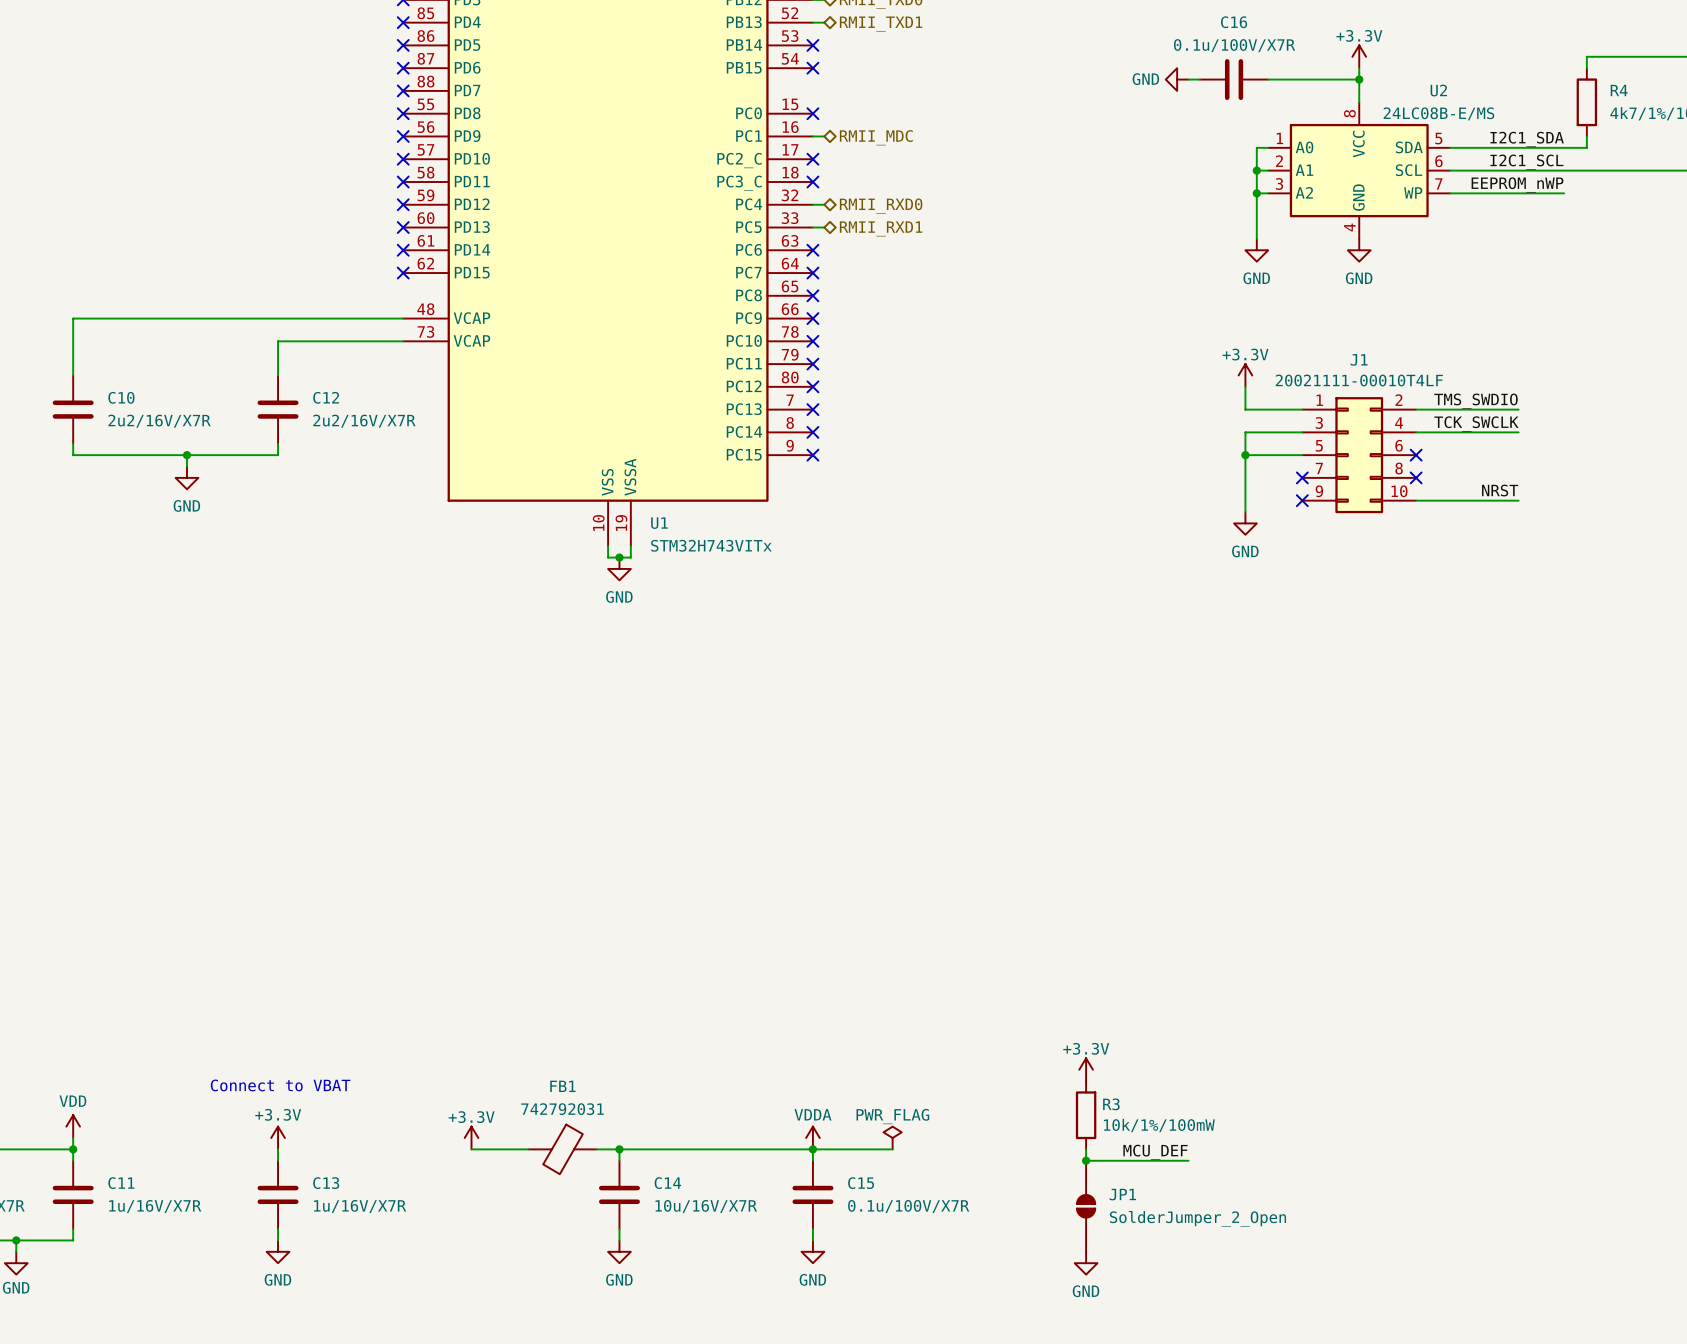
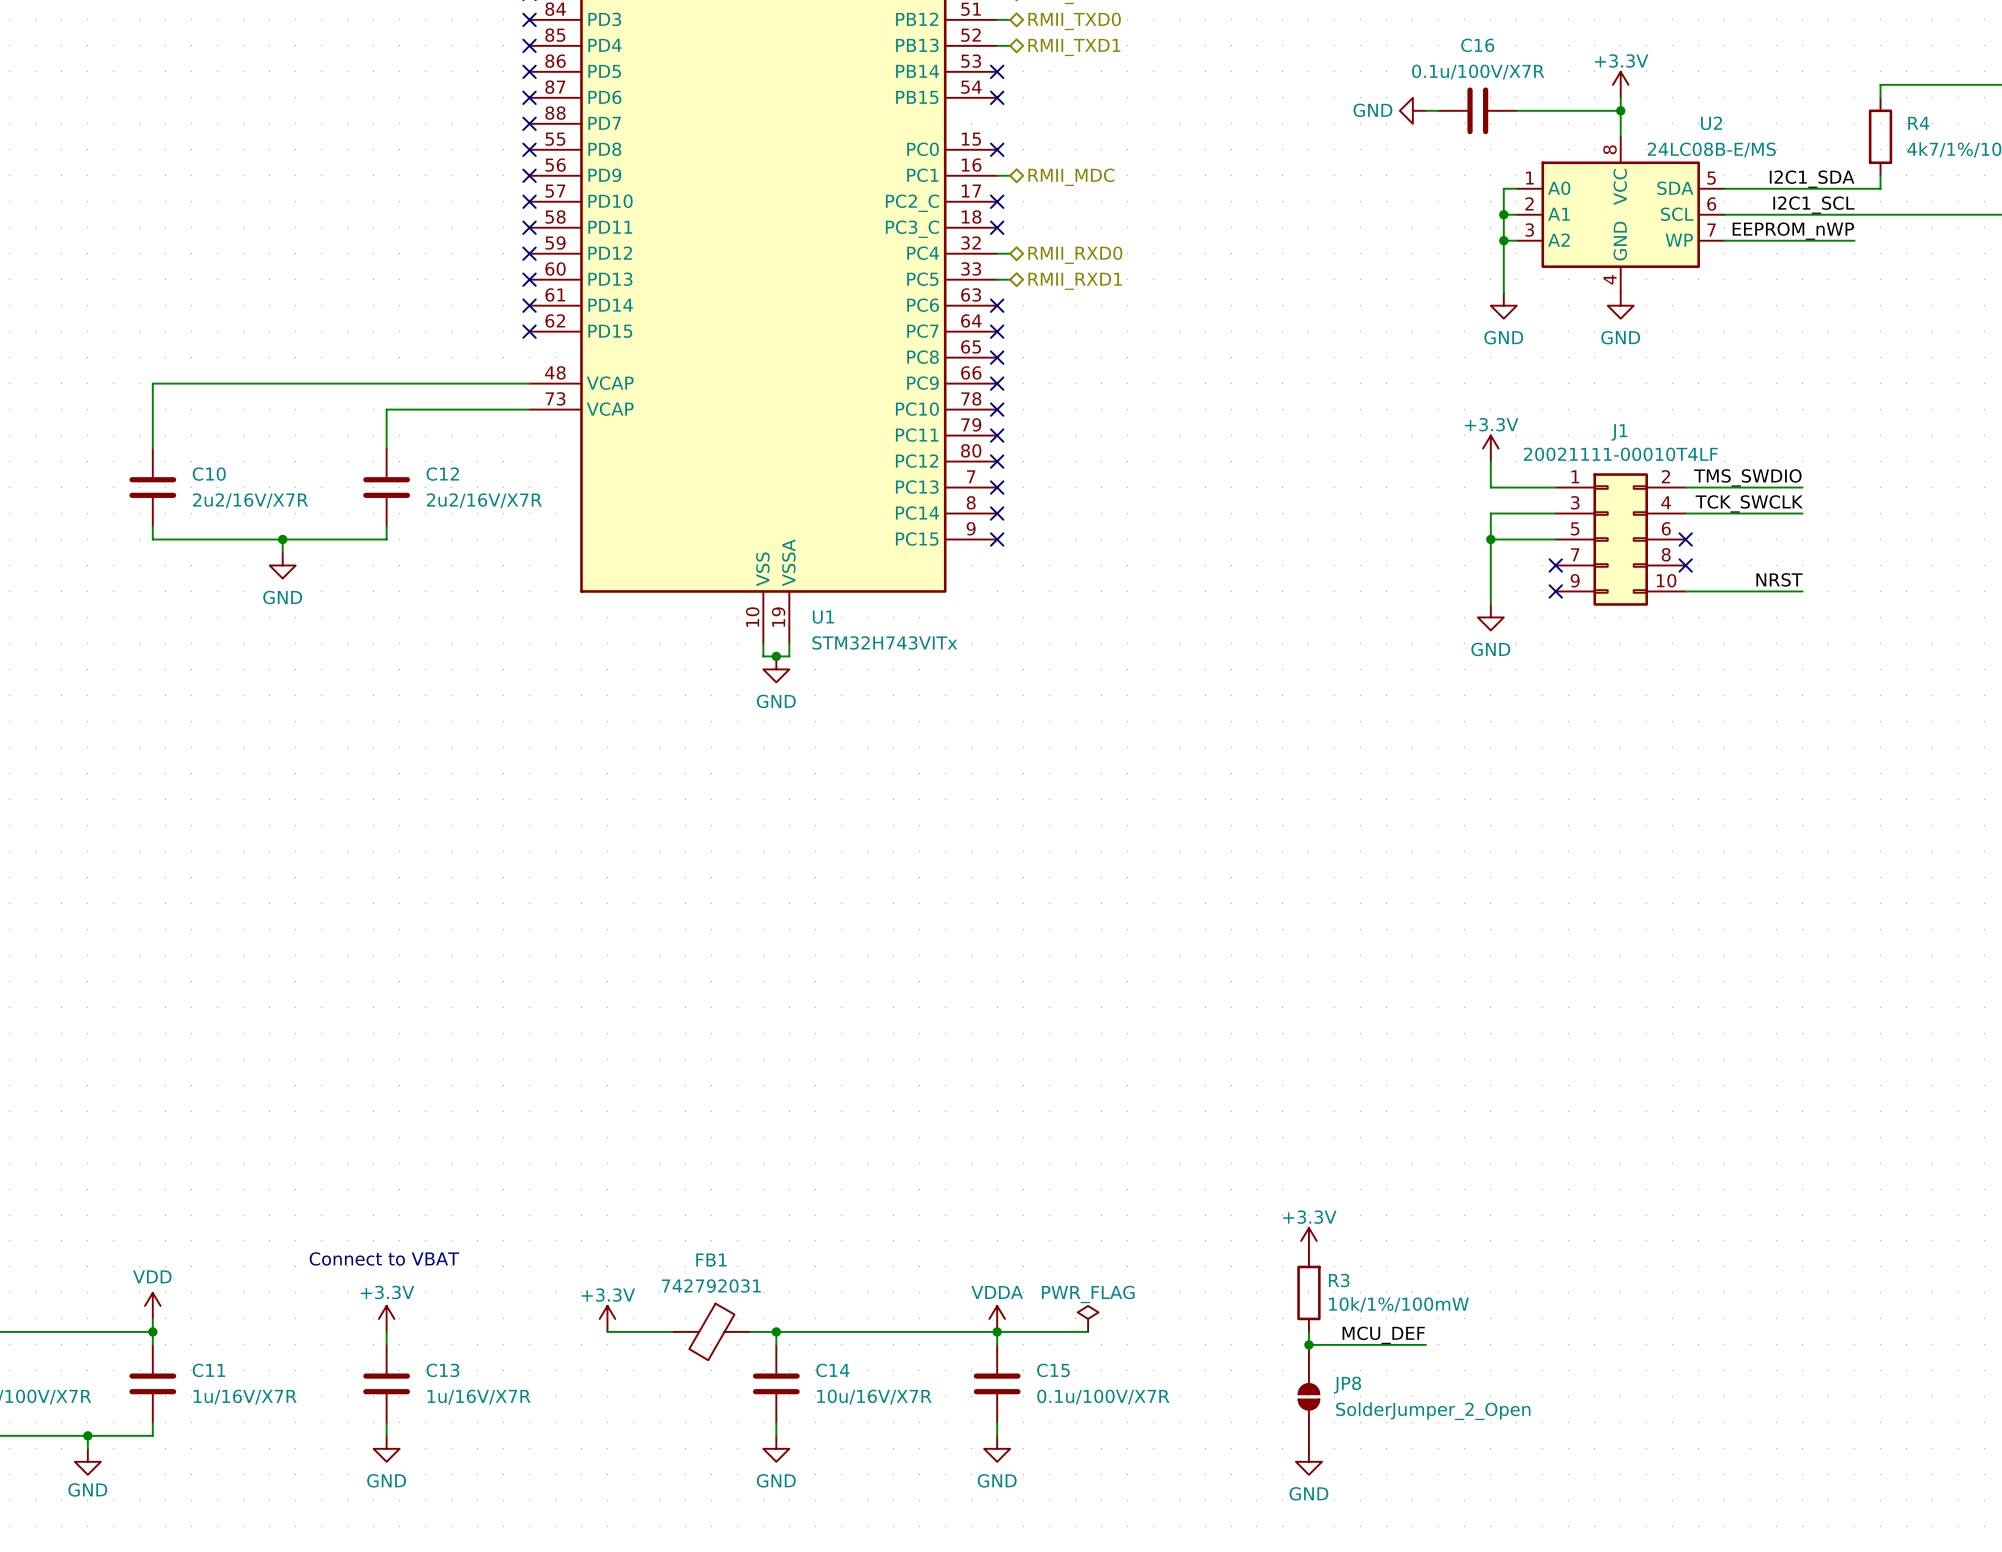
JP1 name: JP1 (1122, 1194) -> JP8 (1347, 1385)

